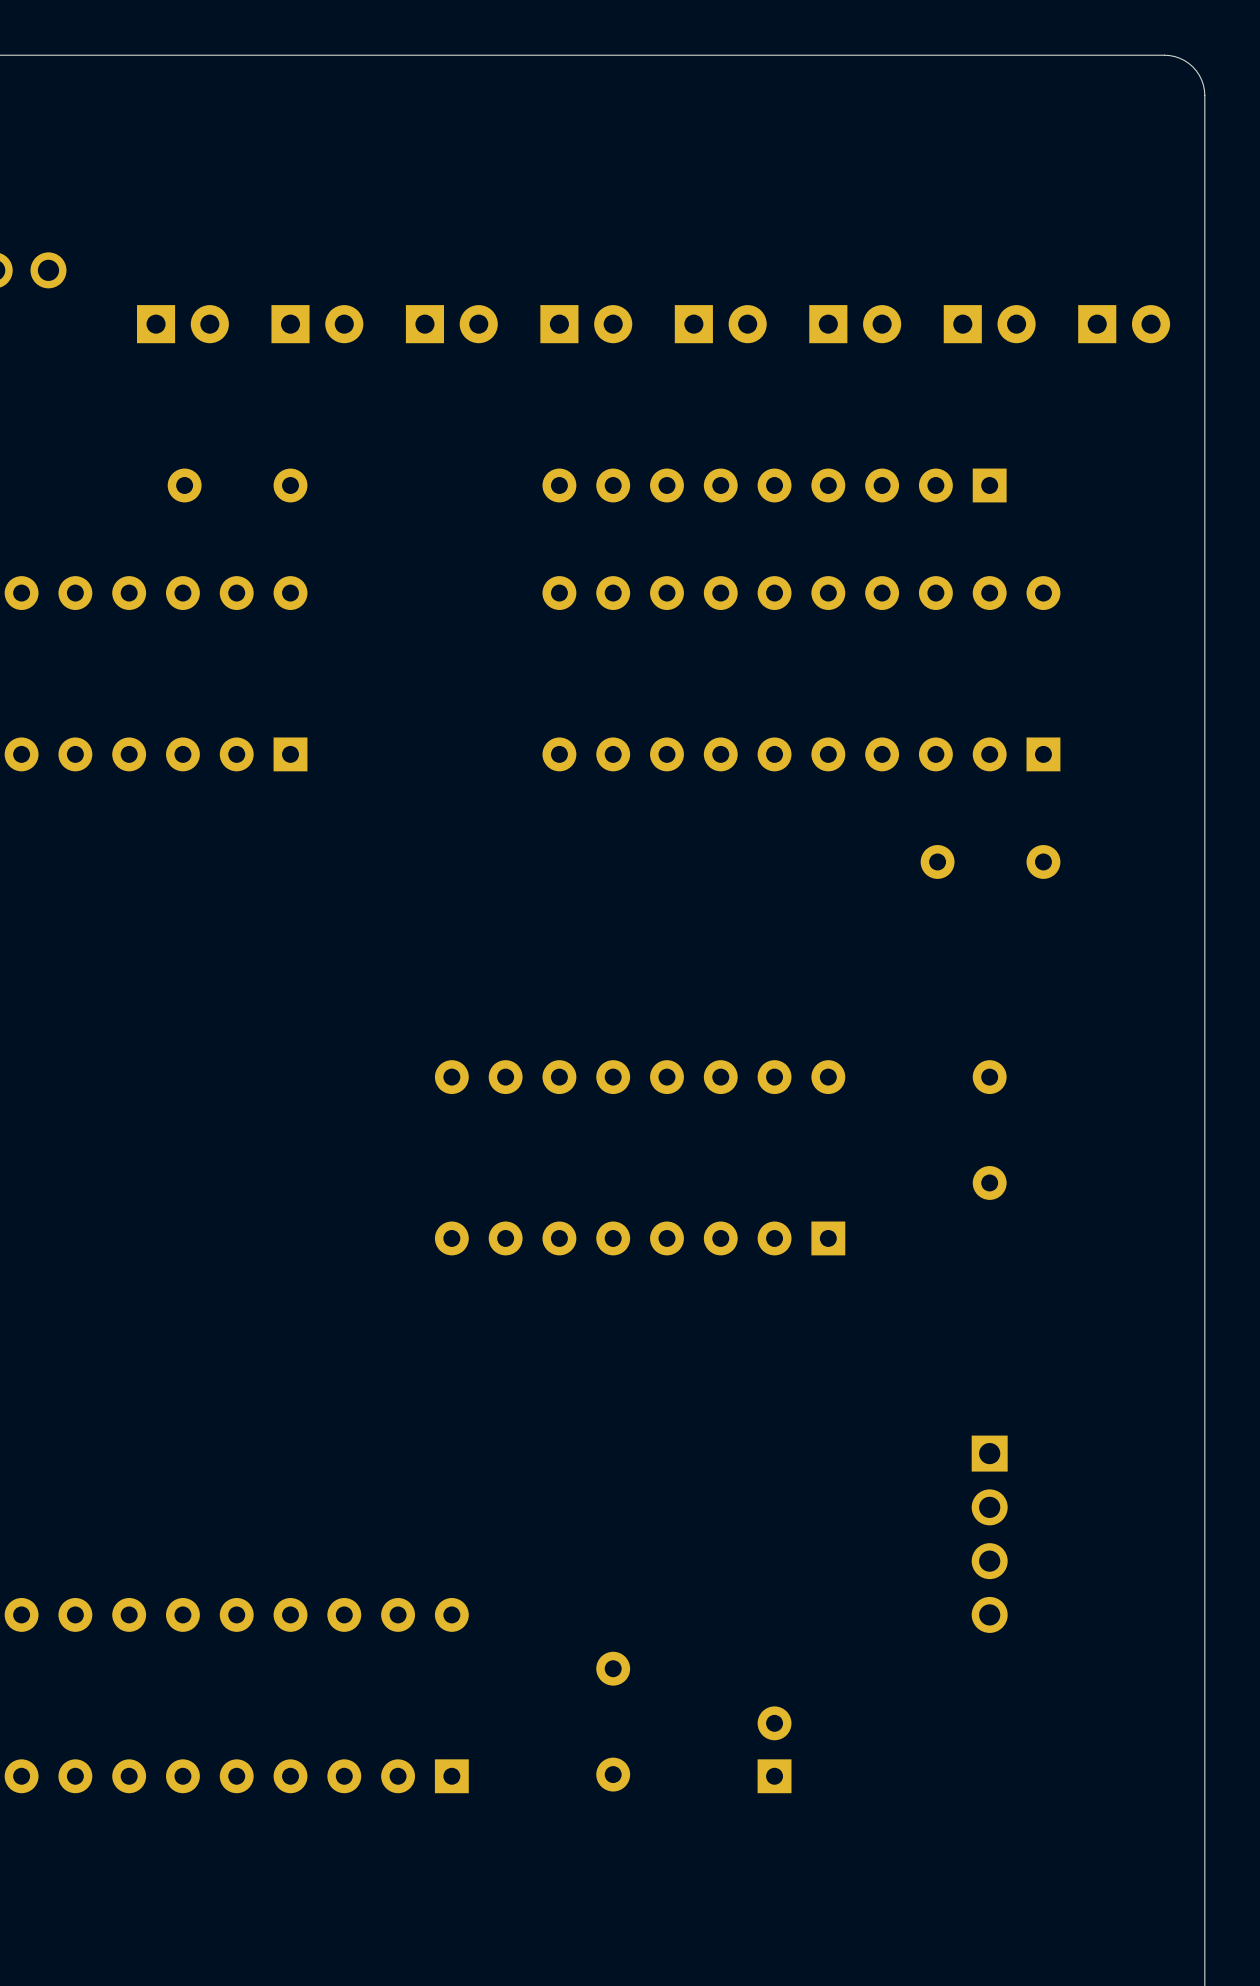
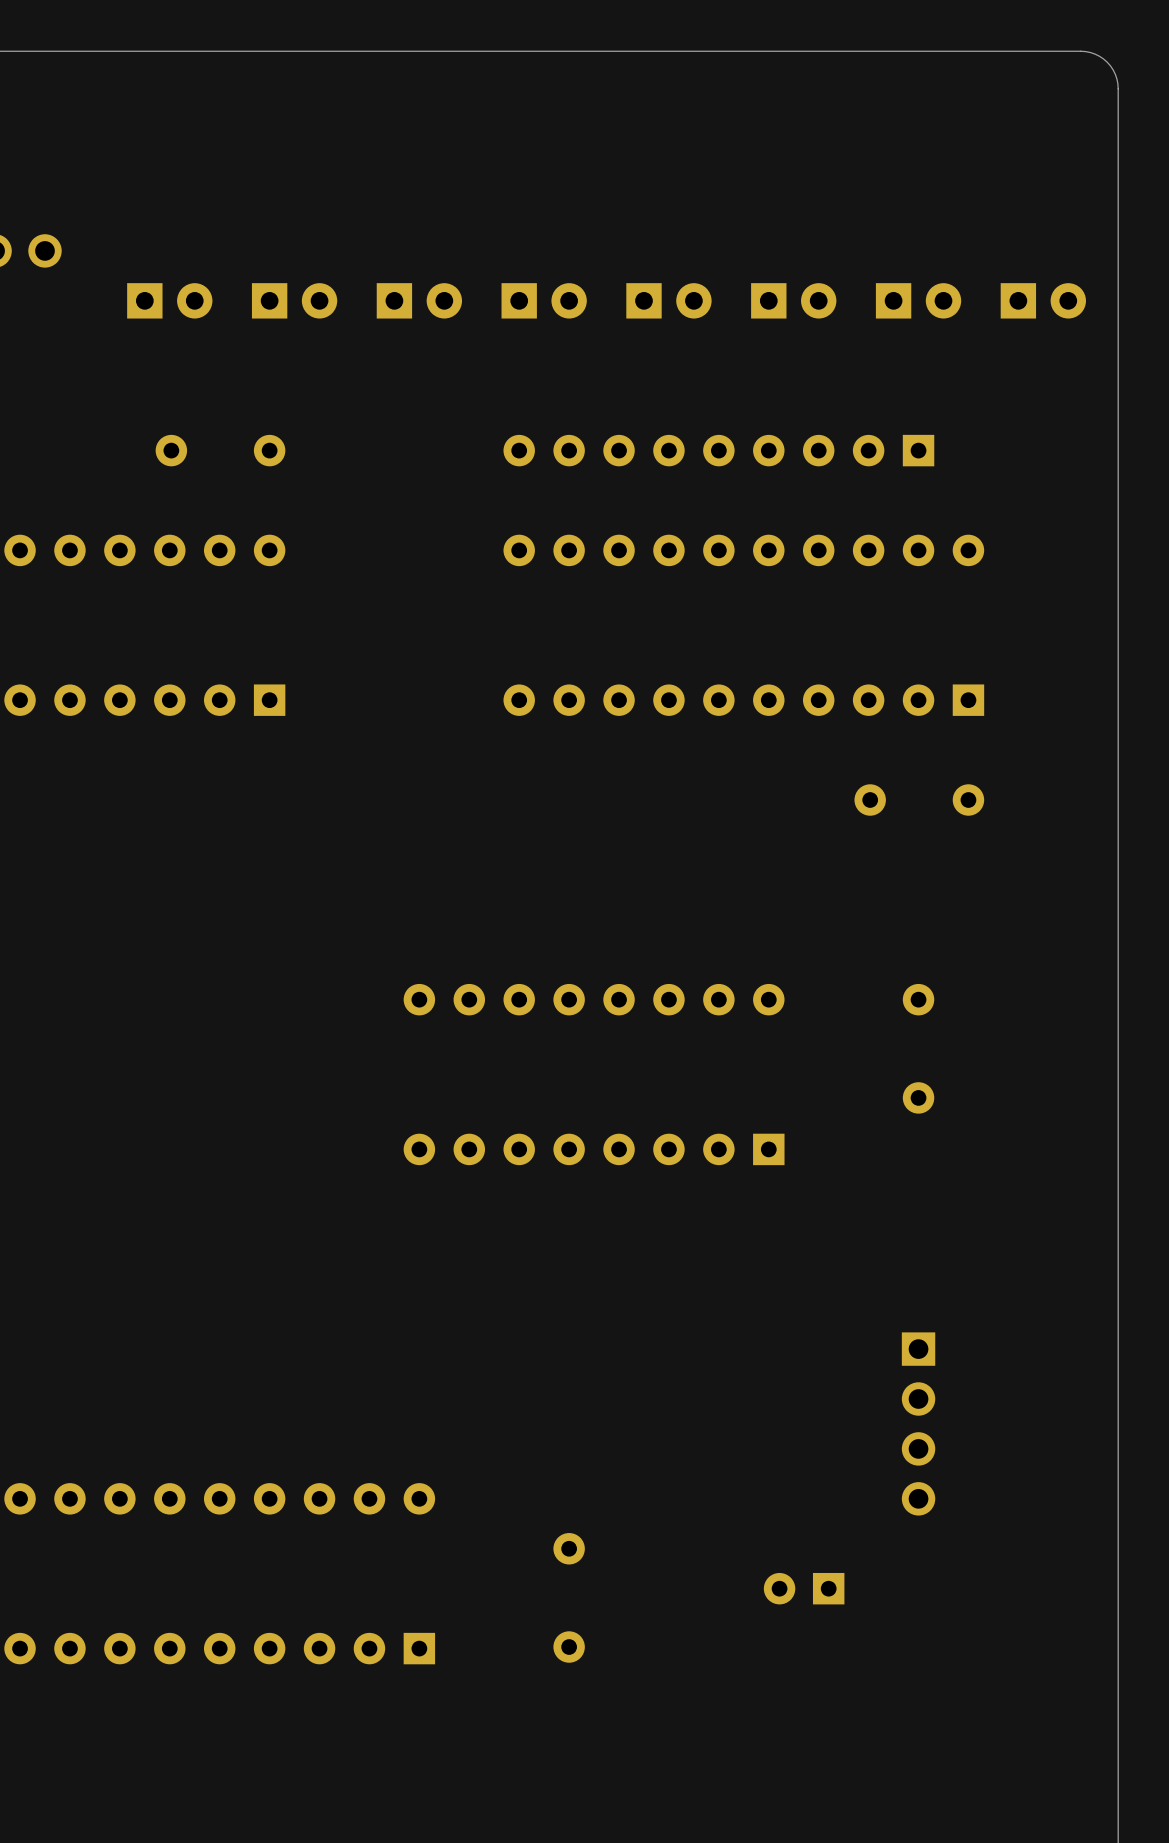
part rotation: 0° (774, 1749) -> 90° counterclockwise (804, 1588)
part position: (774, 1749) -> (804, 1588)

